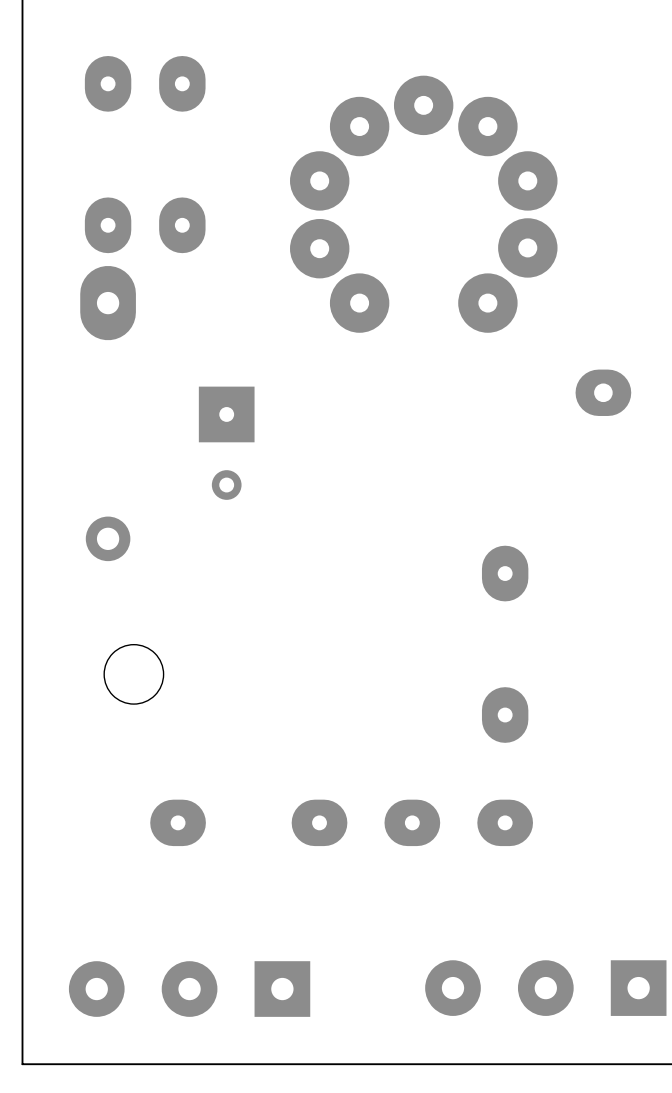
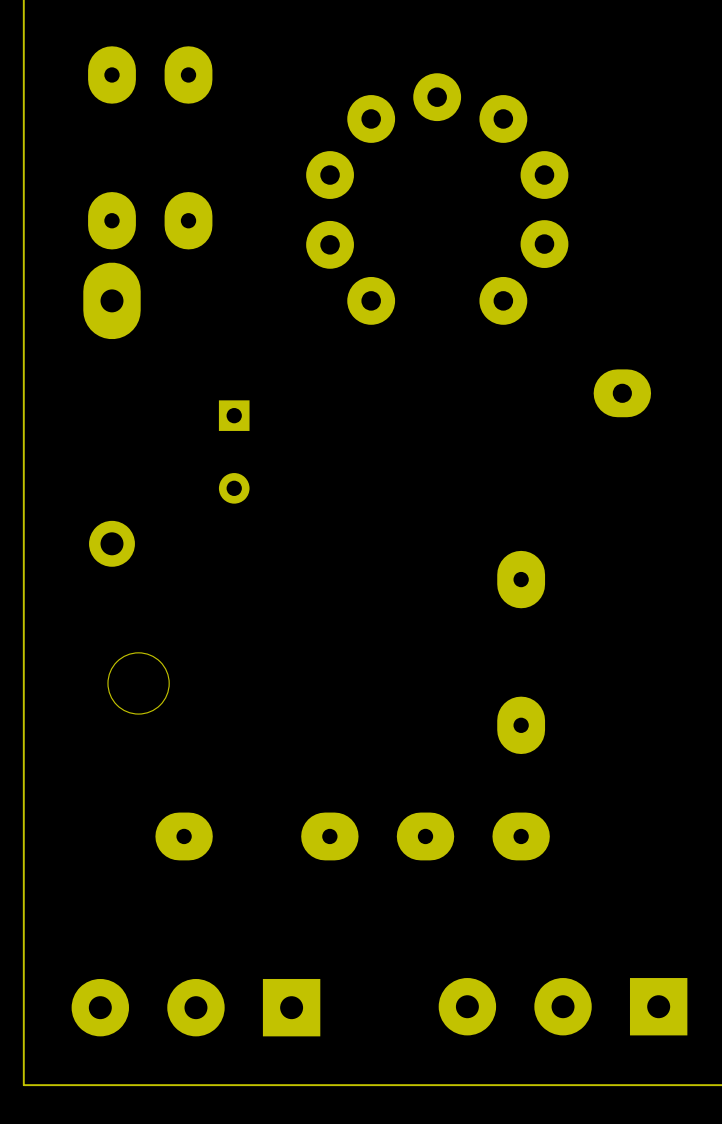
part footprint: [290, 75, 558, 333] -> [306, 73, 569, 325]
part footprint: [198, 386, 255, 500] -> [218, 400, 250, 504]

